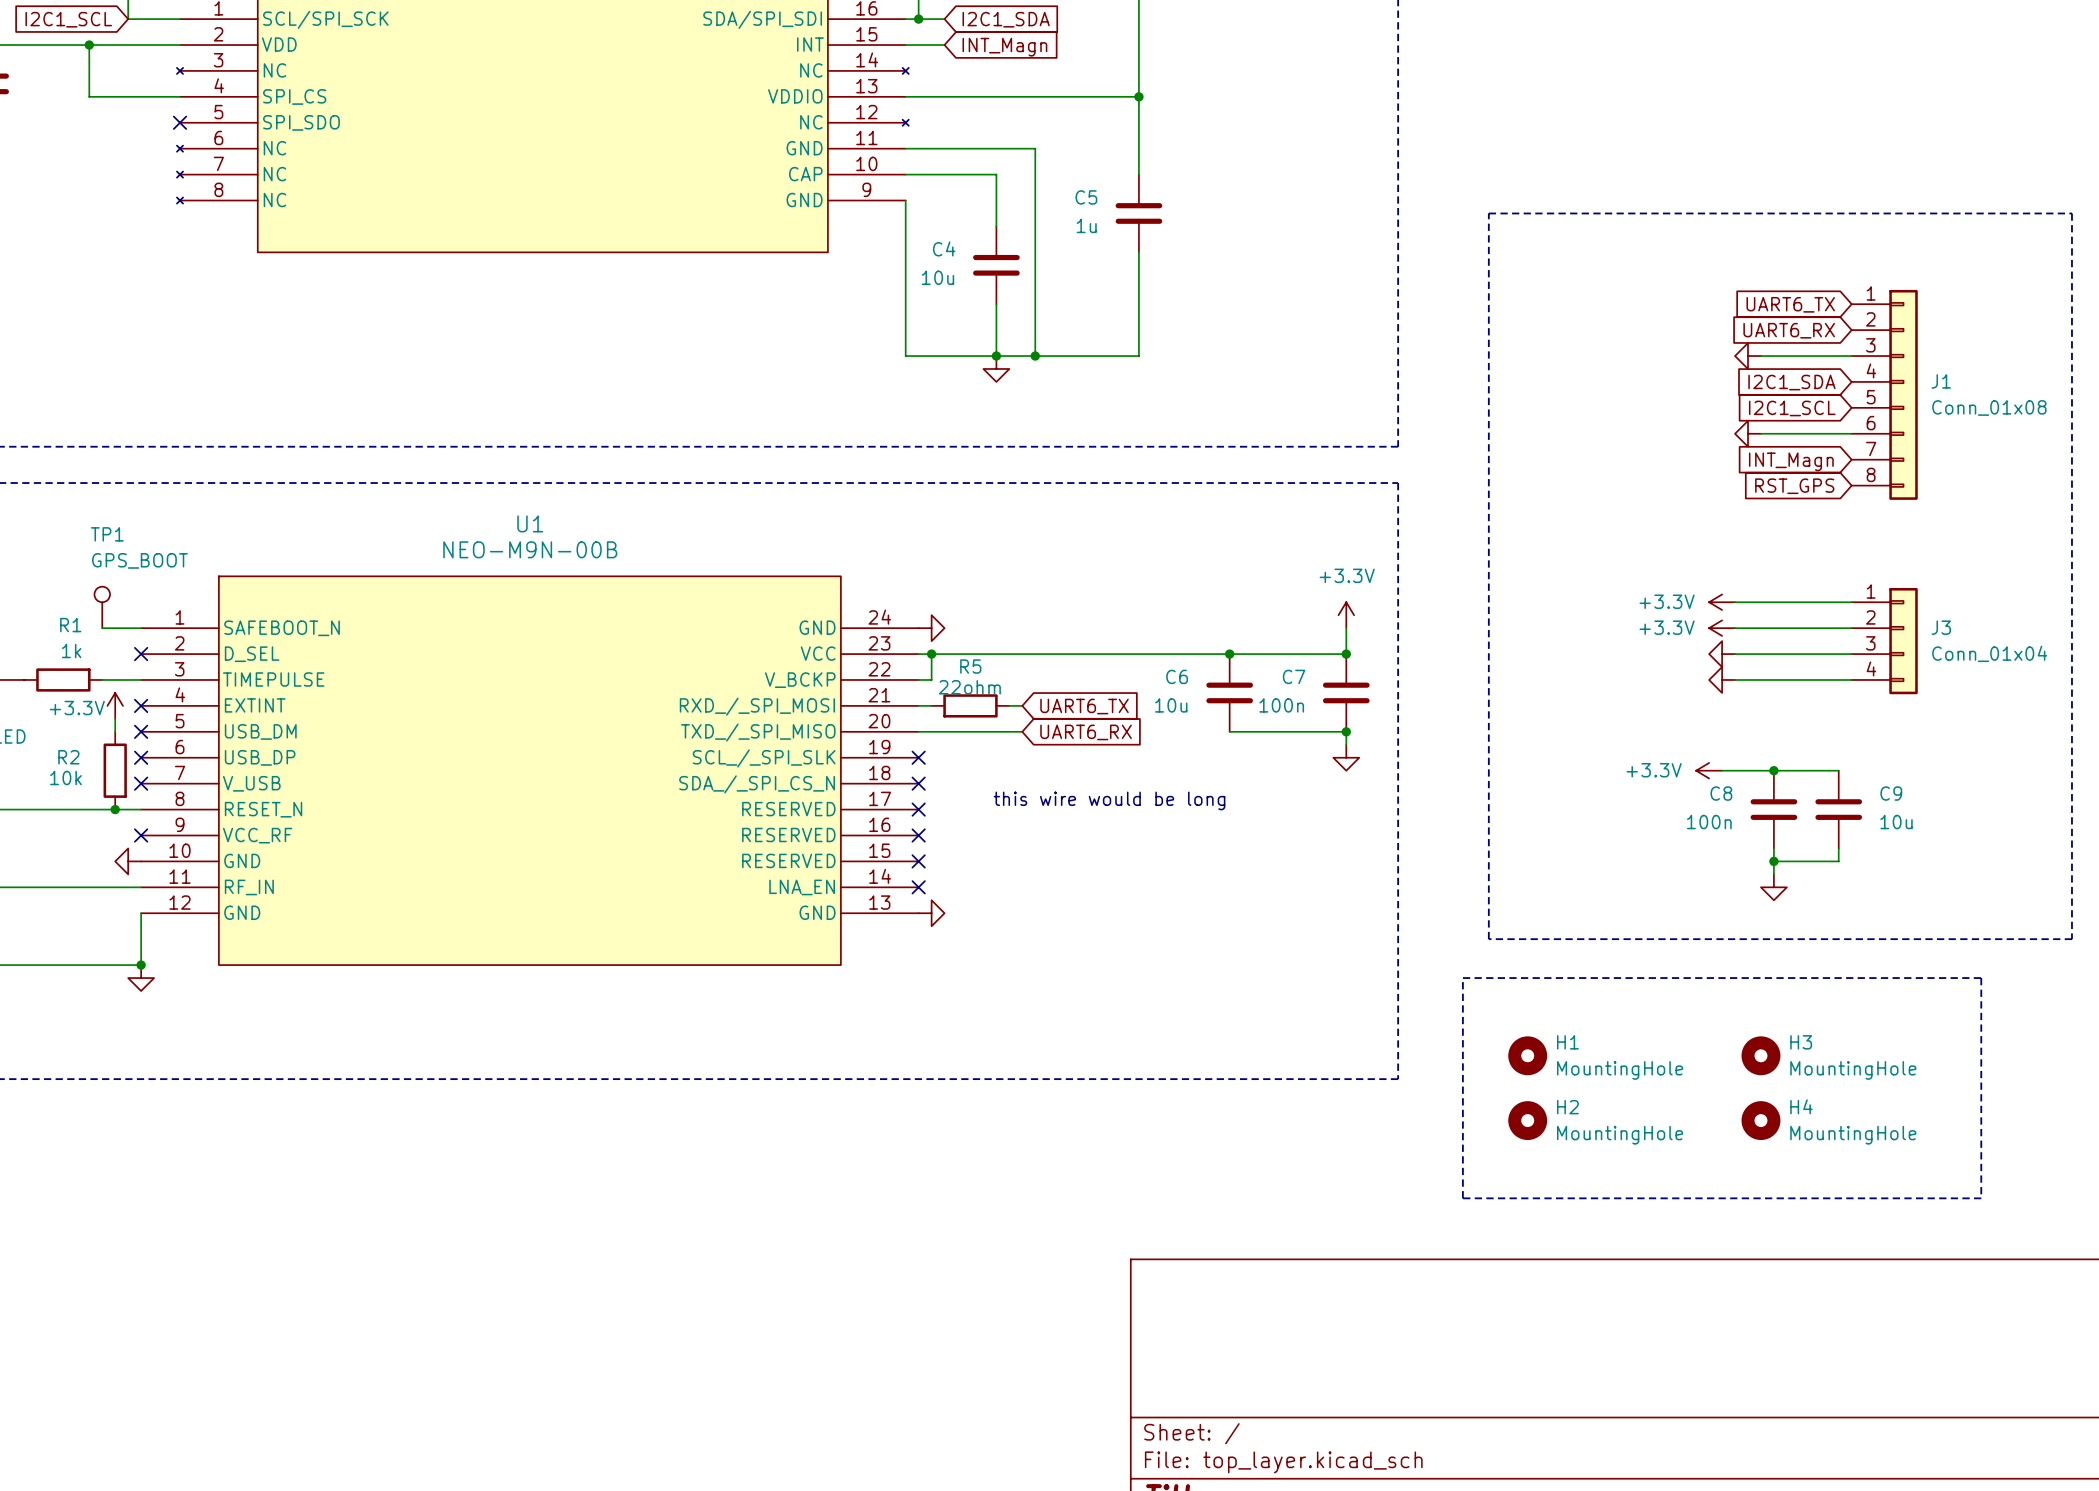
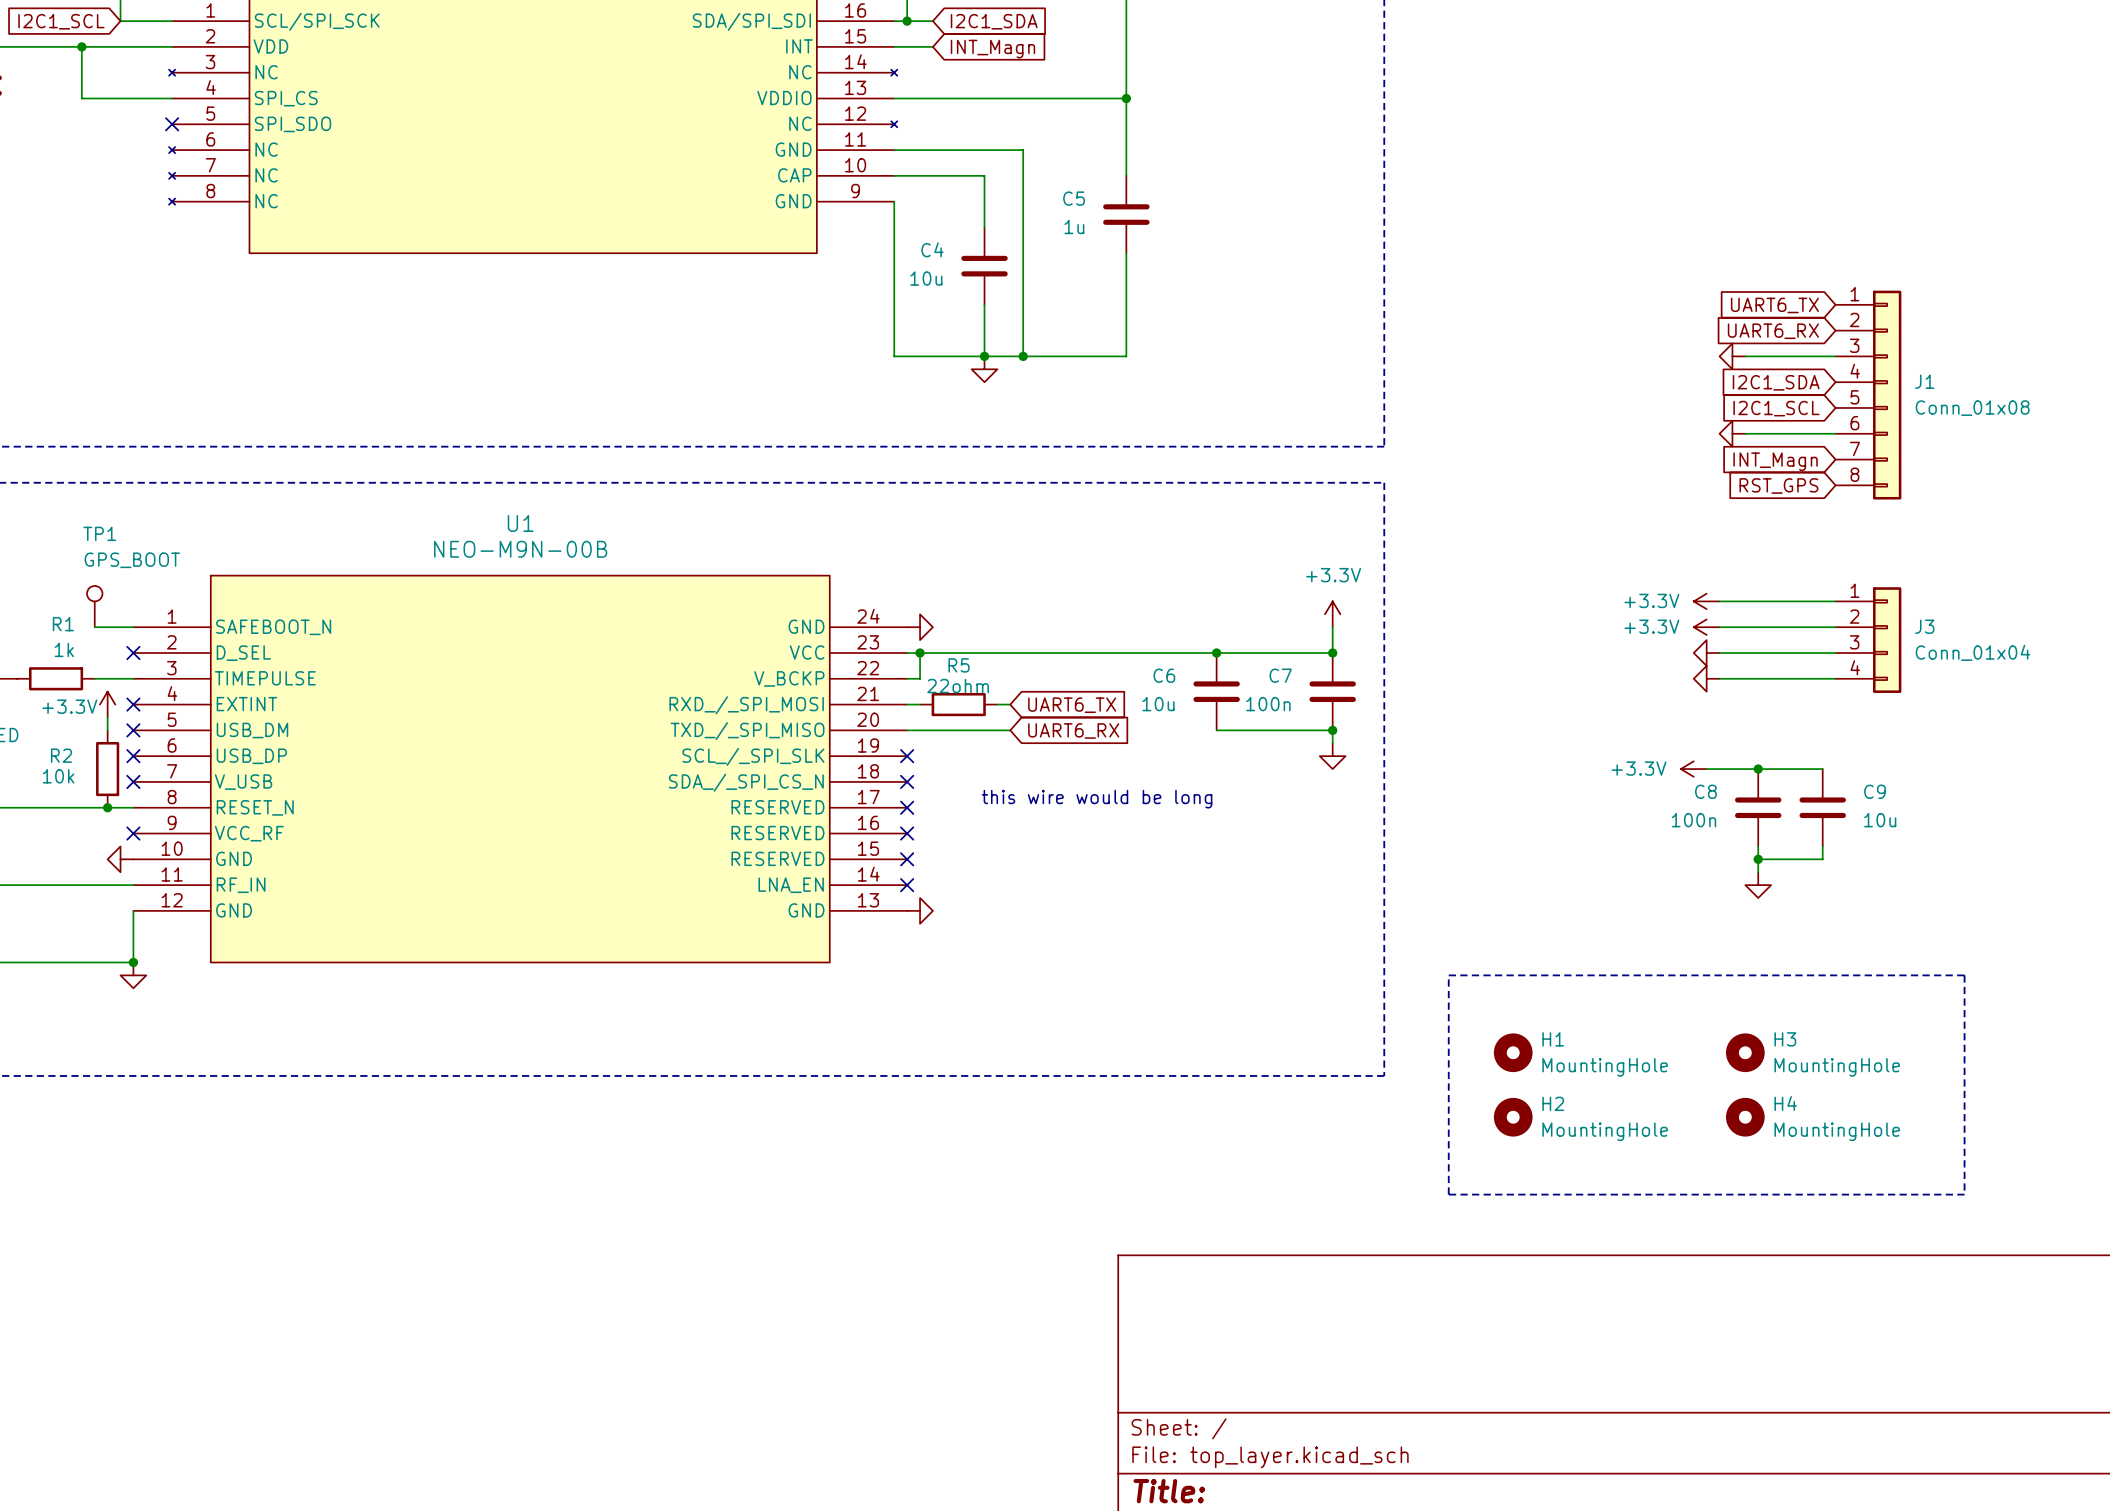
line: (1488, 213) (2071, 213) (2071, 939) (1488, 939) (1488, 213) -> none

